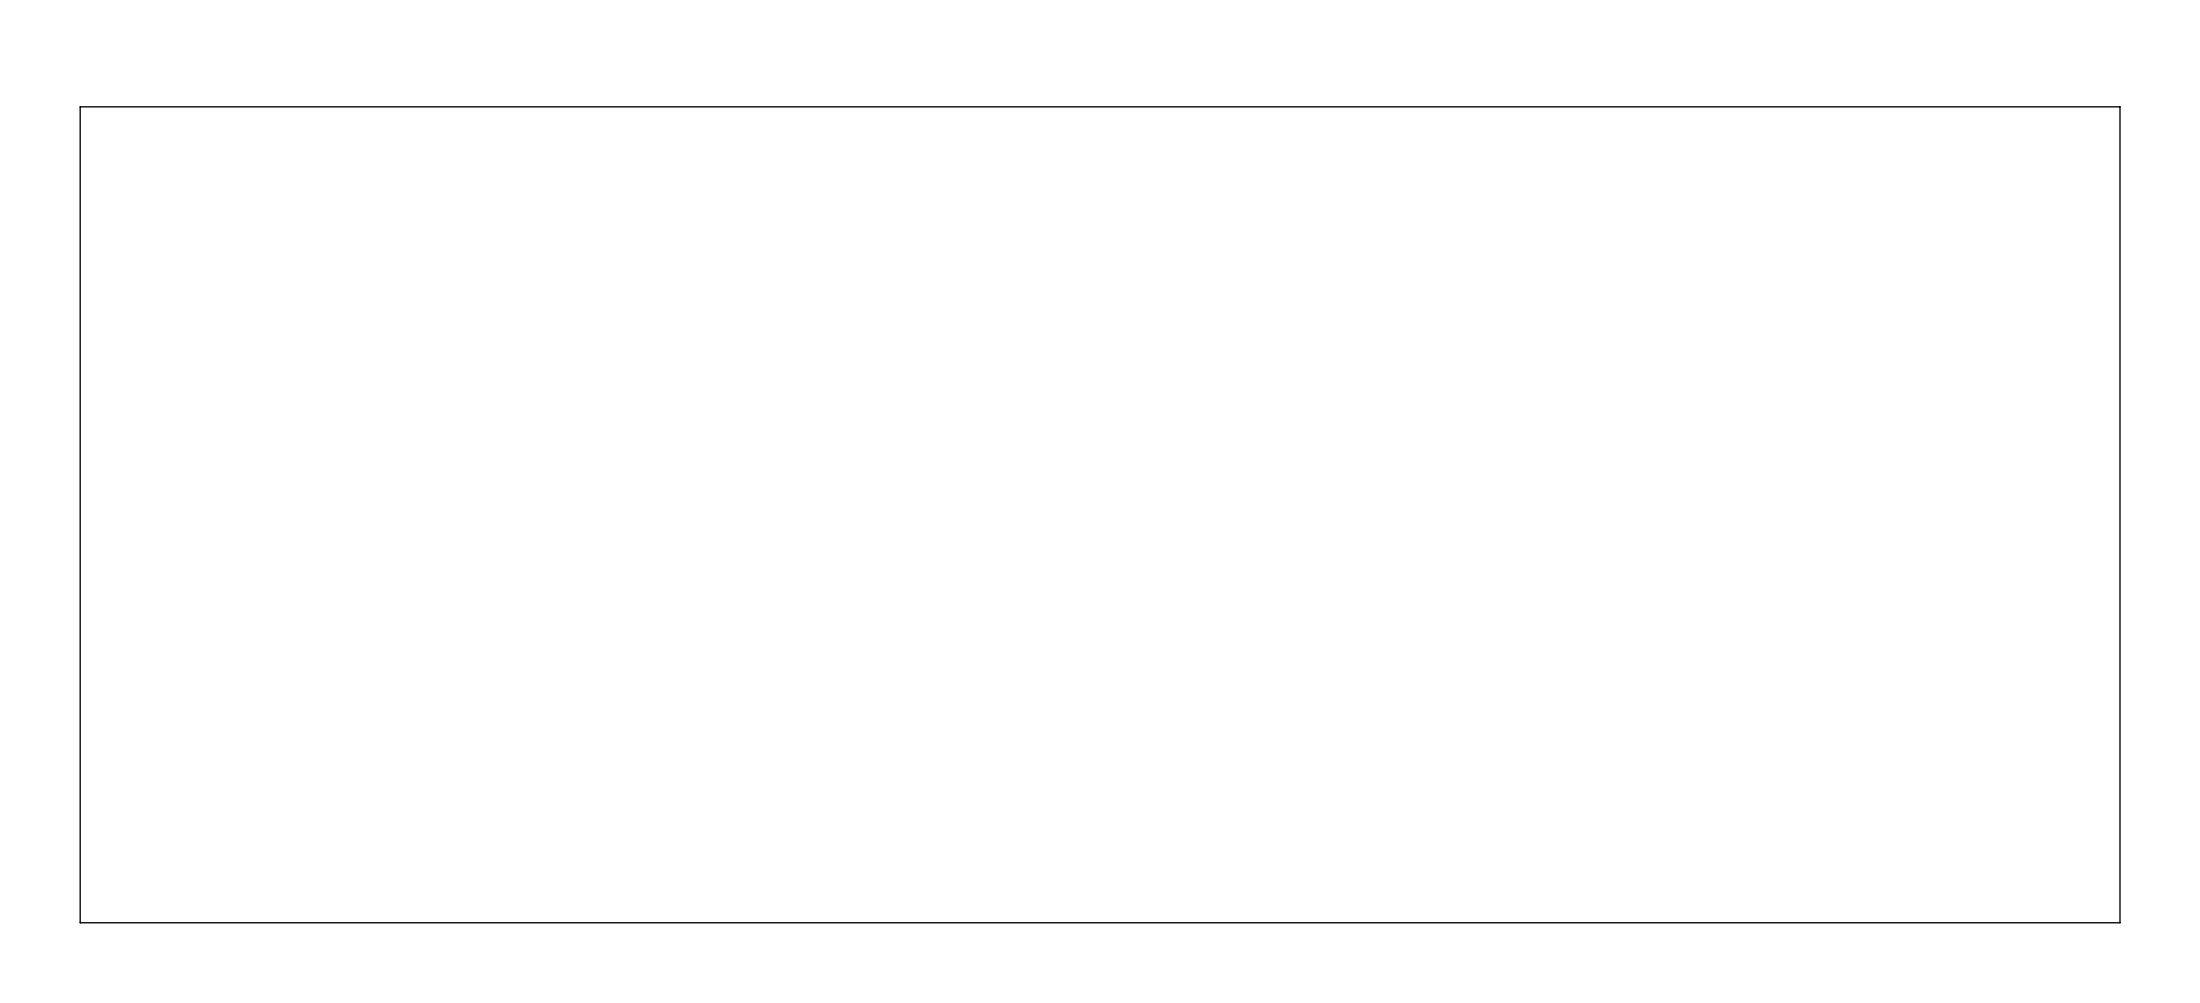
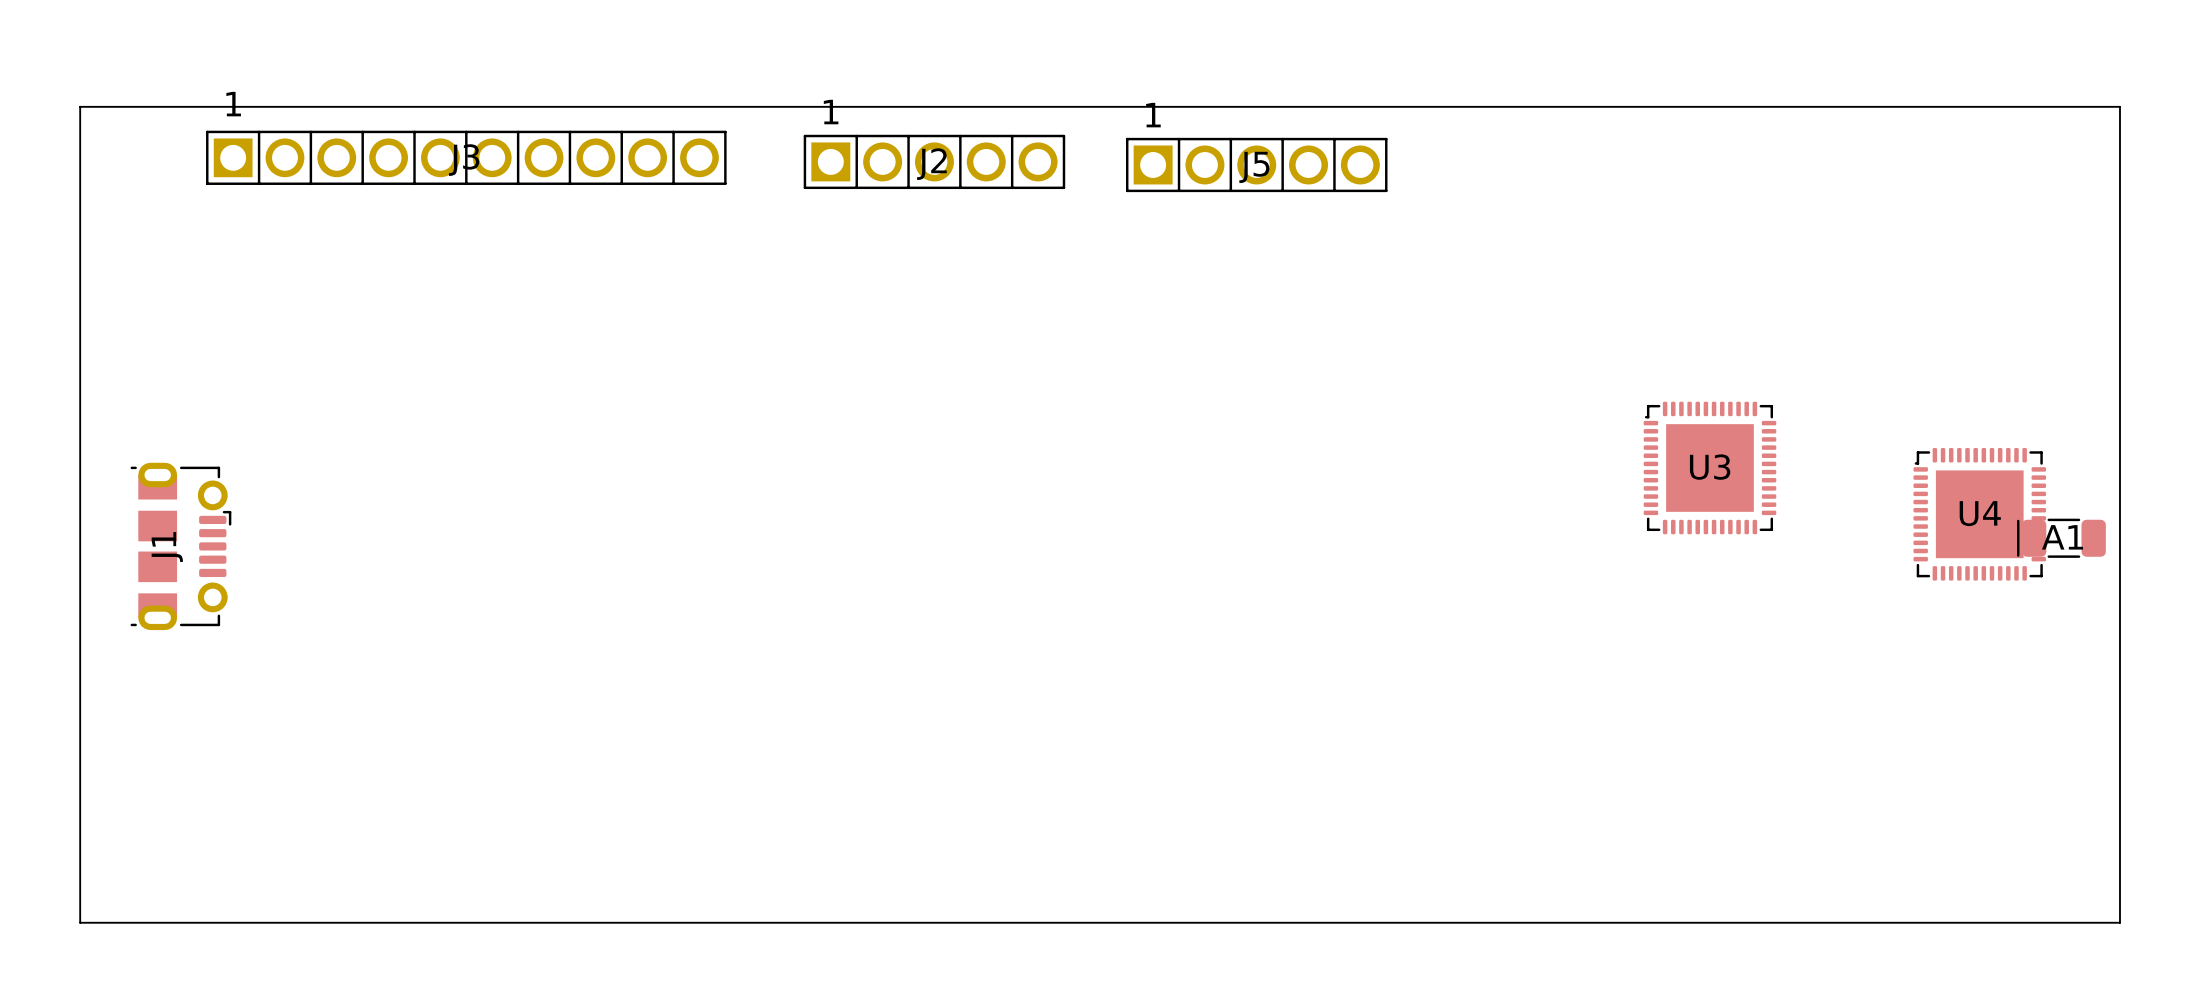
J3: none -> (466, 157)
J2: none -> (934, 161)
J5: none -> (1256, 164)
U3: none -> (1709, 467)
U4: none -> (1979, 514)
A1: none -> (2061, 538)
J1: none -> (180, 546)

